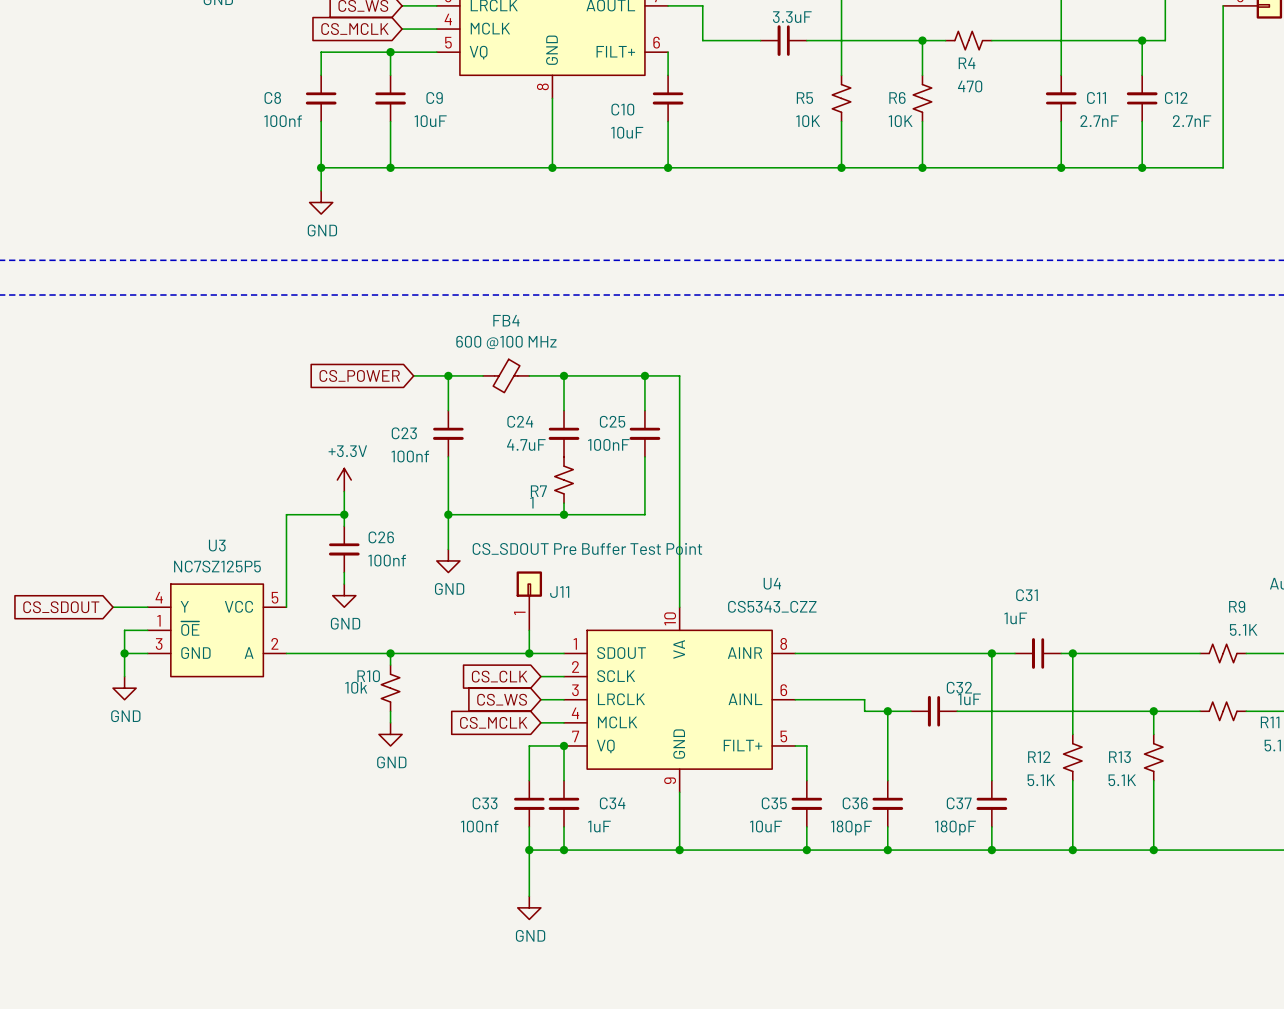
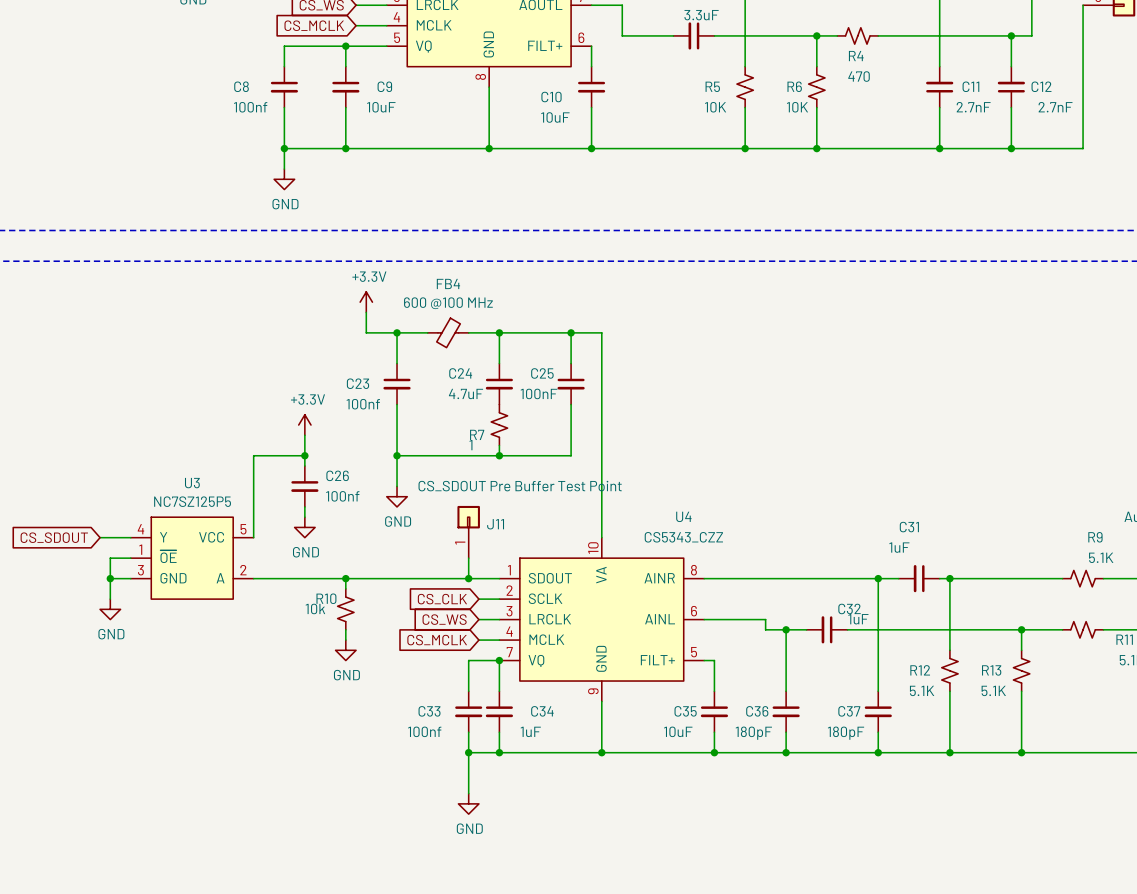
power symbol: none -> +3.3V (366, 302)
wire: none -> (366, 312) (366, 332)
global label: CS_POWER (359, 375) -> none

